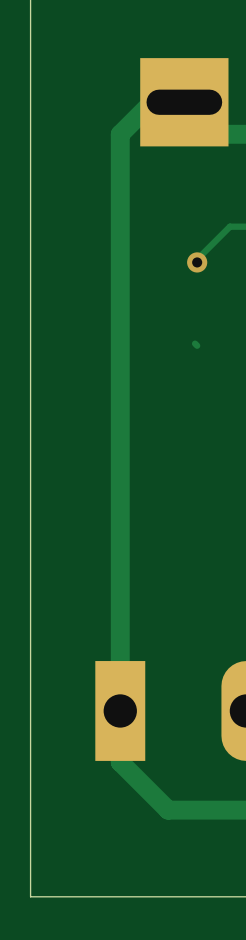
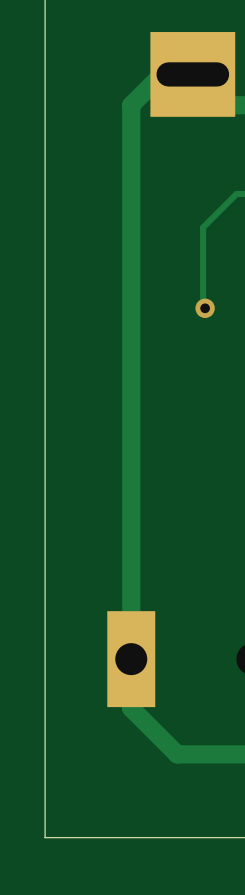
track: none -> (203, 227) (203, 306)
via: (197, 262) -> none
via: none -> (205, 308)

